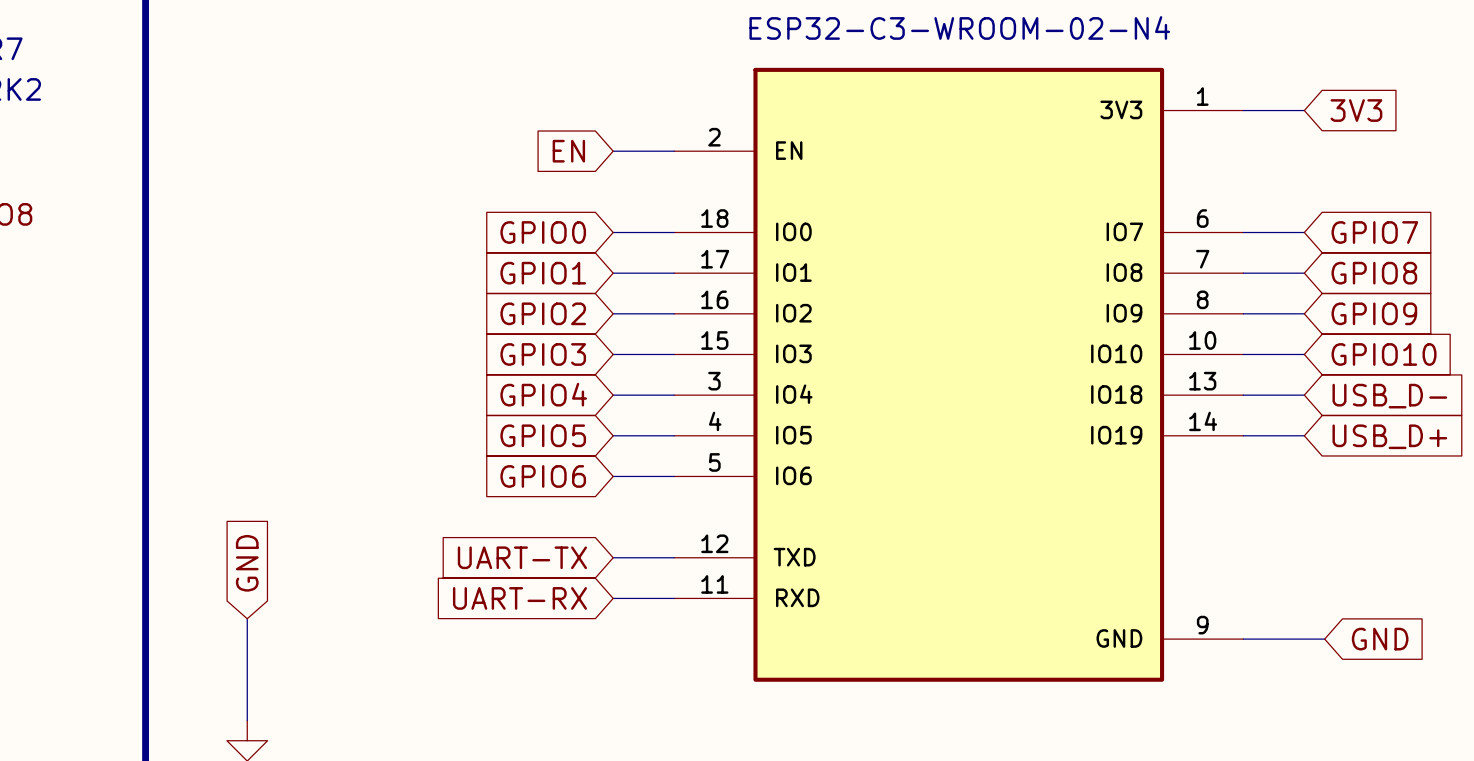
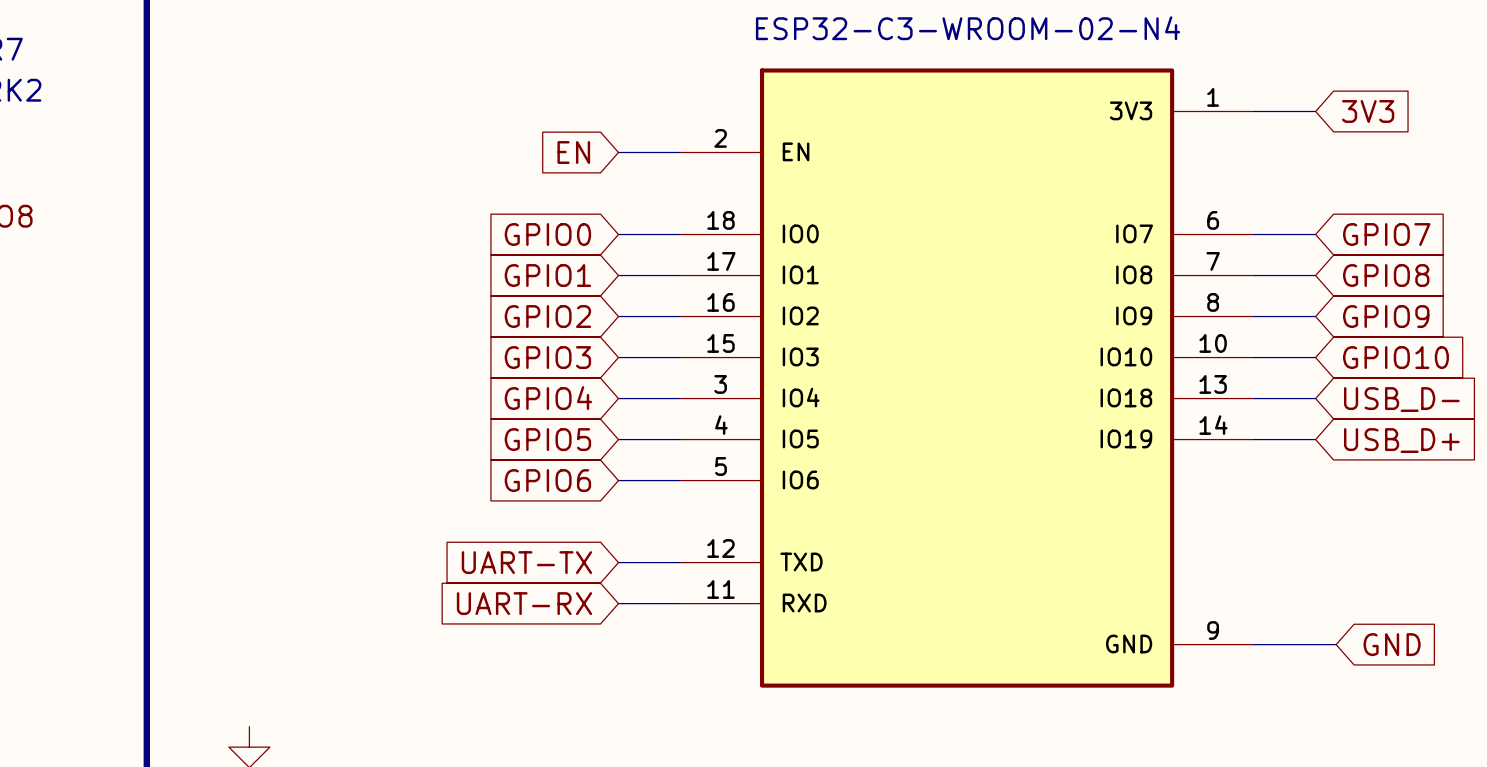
global label: GND (247, 563) -> none
wire: (247, 618) (247, 720) -> none

